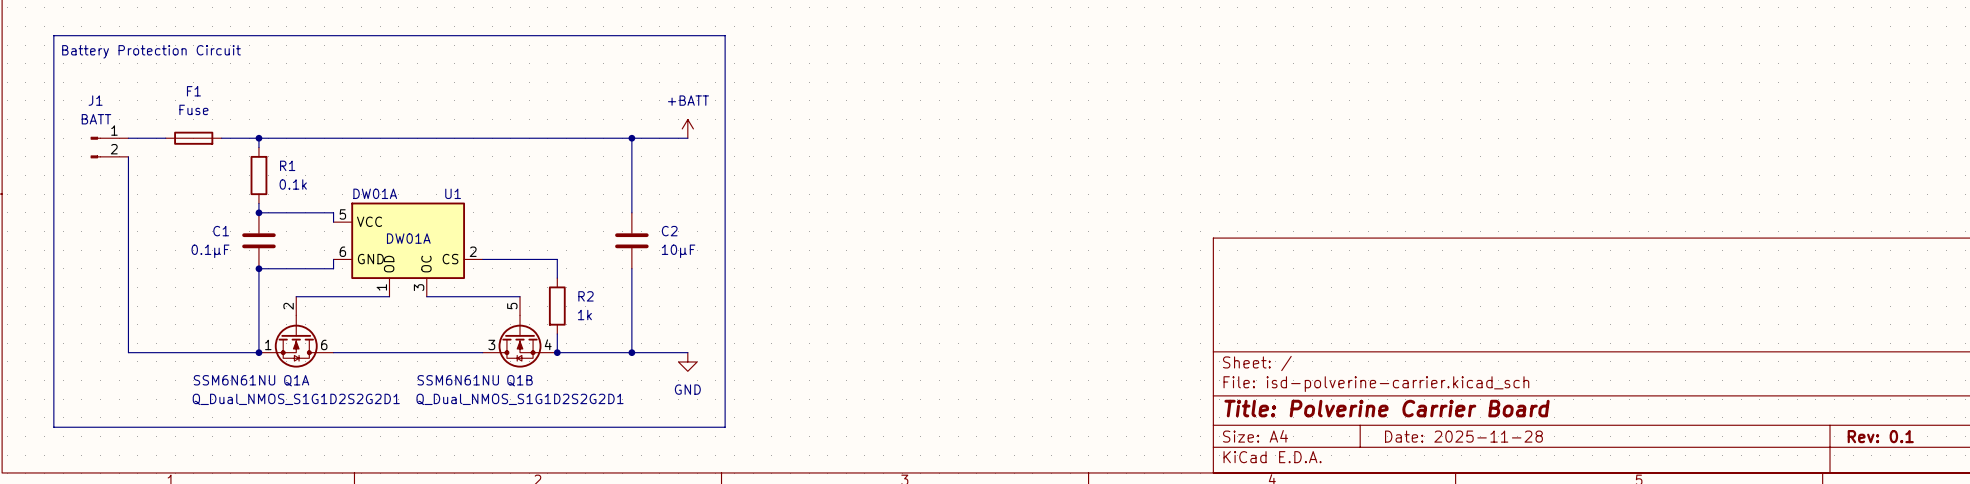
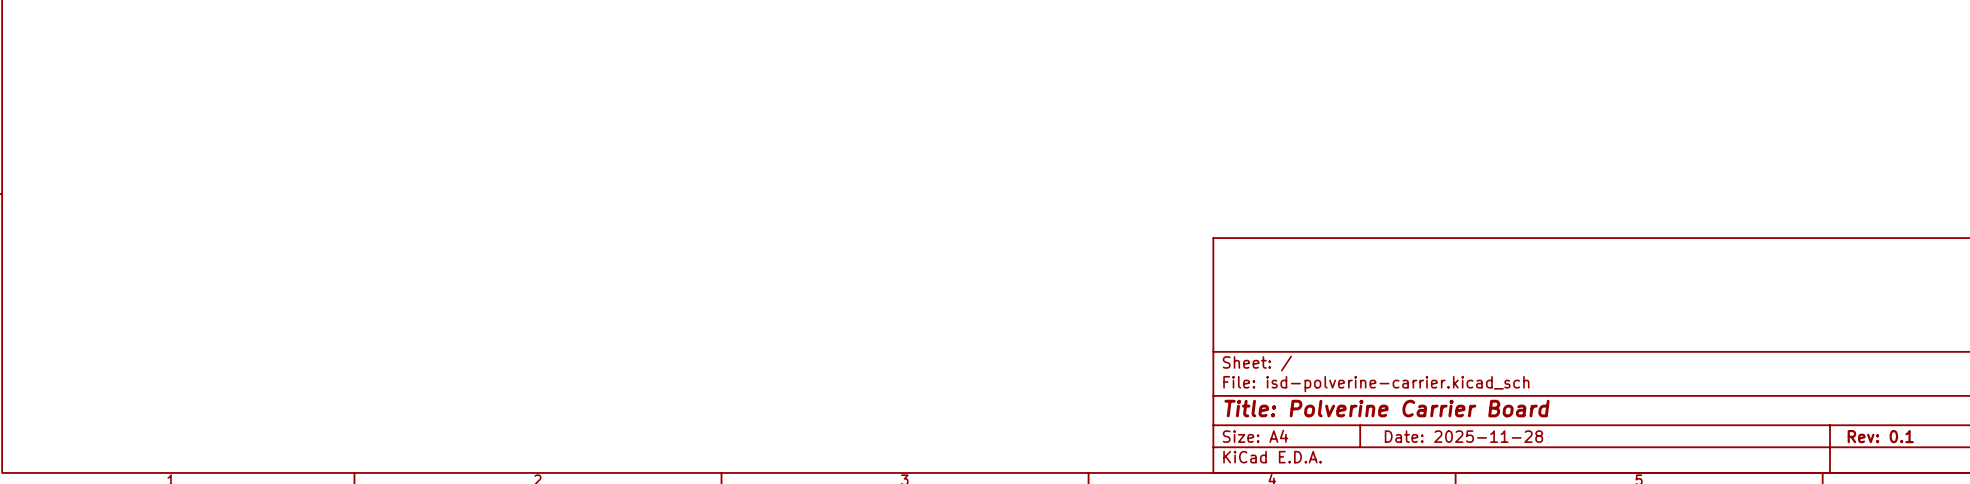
line: (53, 35) (725, 35) (725, 427) (53, 427) (53, 35) -> none
text: Battery Protection Circuit (151, 51) -> none
power symbol: +BATT (687, 128) -> none
wire: (128, 138) (165, 138) -> none
F1: Fuse (193, 138) -> none
wire: (221, 138) (687, 138) -> none
wire: (258, 138) (258, 147) -> none
junction: (258, 138) -> none
wire: (631, 138) (631, 212) -> none
junction: (631, 138) -> none
J1: BATT (109, 147) -> none
wire: (128, 156) (128, 352) (258, 352) (258, 268) (333, 268) (333, 259) -> none
R1: 0.1k (258, 175) -> none
wire: (258, 203) (258, 212) (333, 212) (333, 222) -> none
junction: (258, 212) -> none
C1: 0.1µF (258, 240) -> none
C2: 10µF (631, 240) -> none
U1: DW01A (408, 249) -> none
wire: (482, 259) (557, 259) (557, 278) -> none
junction: (258, 268) -> none
wire: (631, 268) (631, 352) -> none
wire: (296, 296) (389, 296) -> none
wire: (426, 296) (520, 296) -> none
R2: 1k (557, 306) -> none
Q1A: Q_Dual_NMOS_S1G1D2S2G2D1 (296, 332) -> none
Q1B: Q_Dual_NMOS_S1G1D2S2G2D1 (520, 332) -> none
wire: (557, 334) (557, 352) (687, 352) -> none
junction: (258, 352) -> none
wire: (333, 352) (482, 352) -> none
junction: (557, 352) -> none
junction: (631, 352) -> none
power symbol: GND (687, 361) -> none

